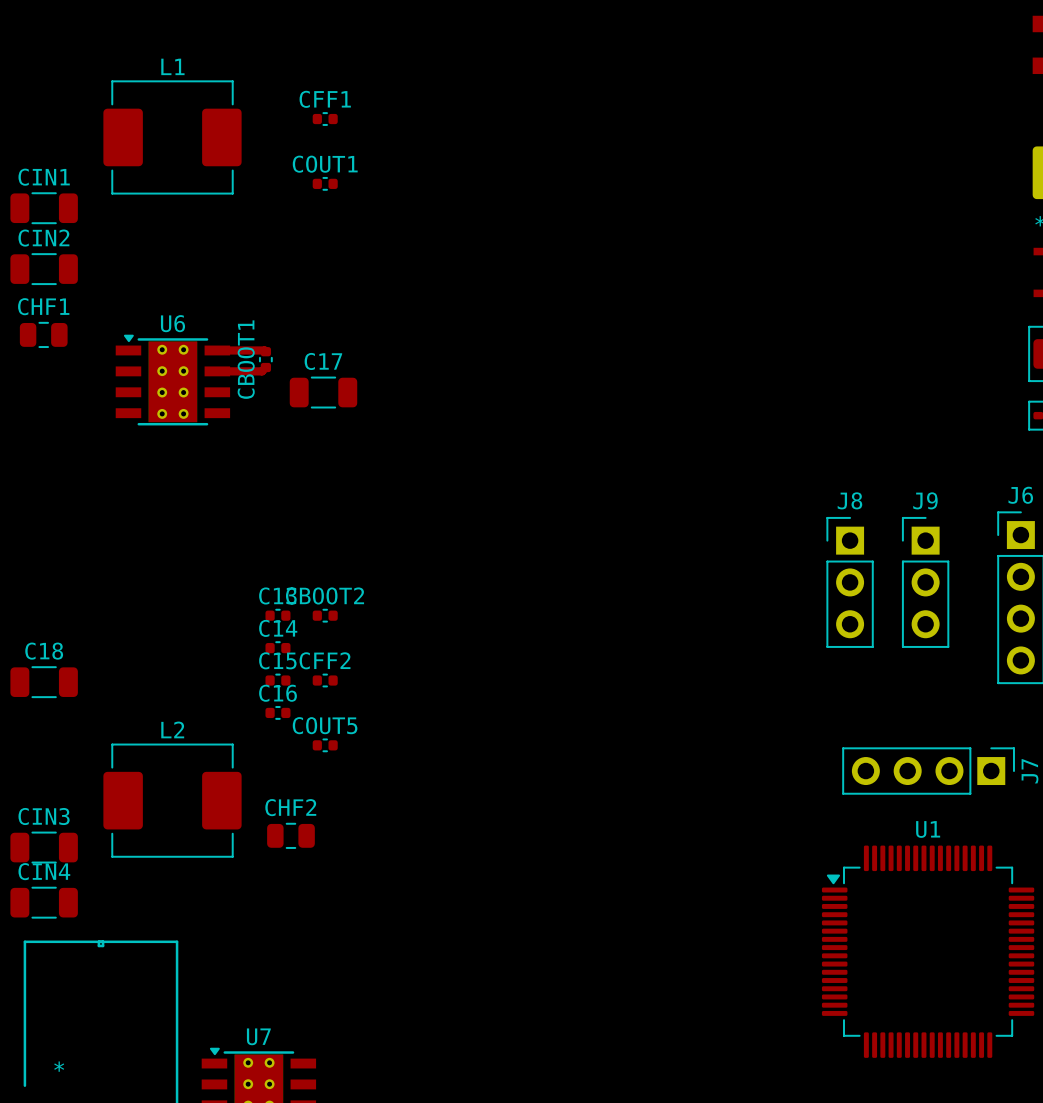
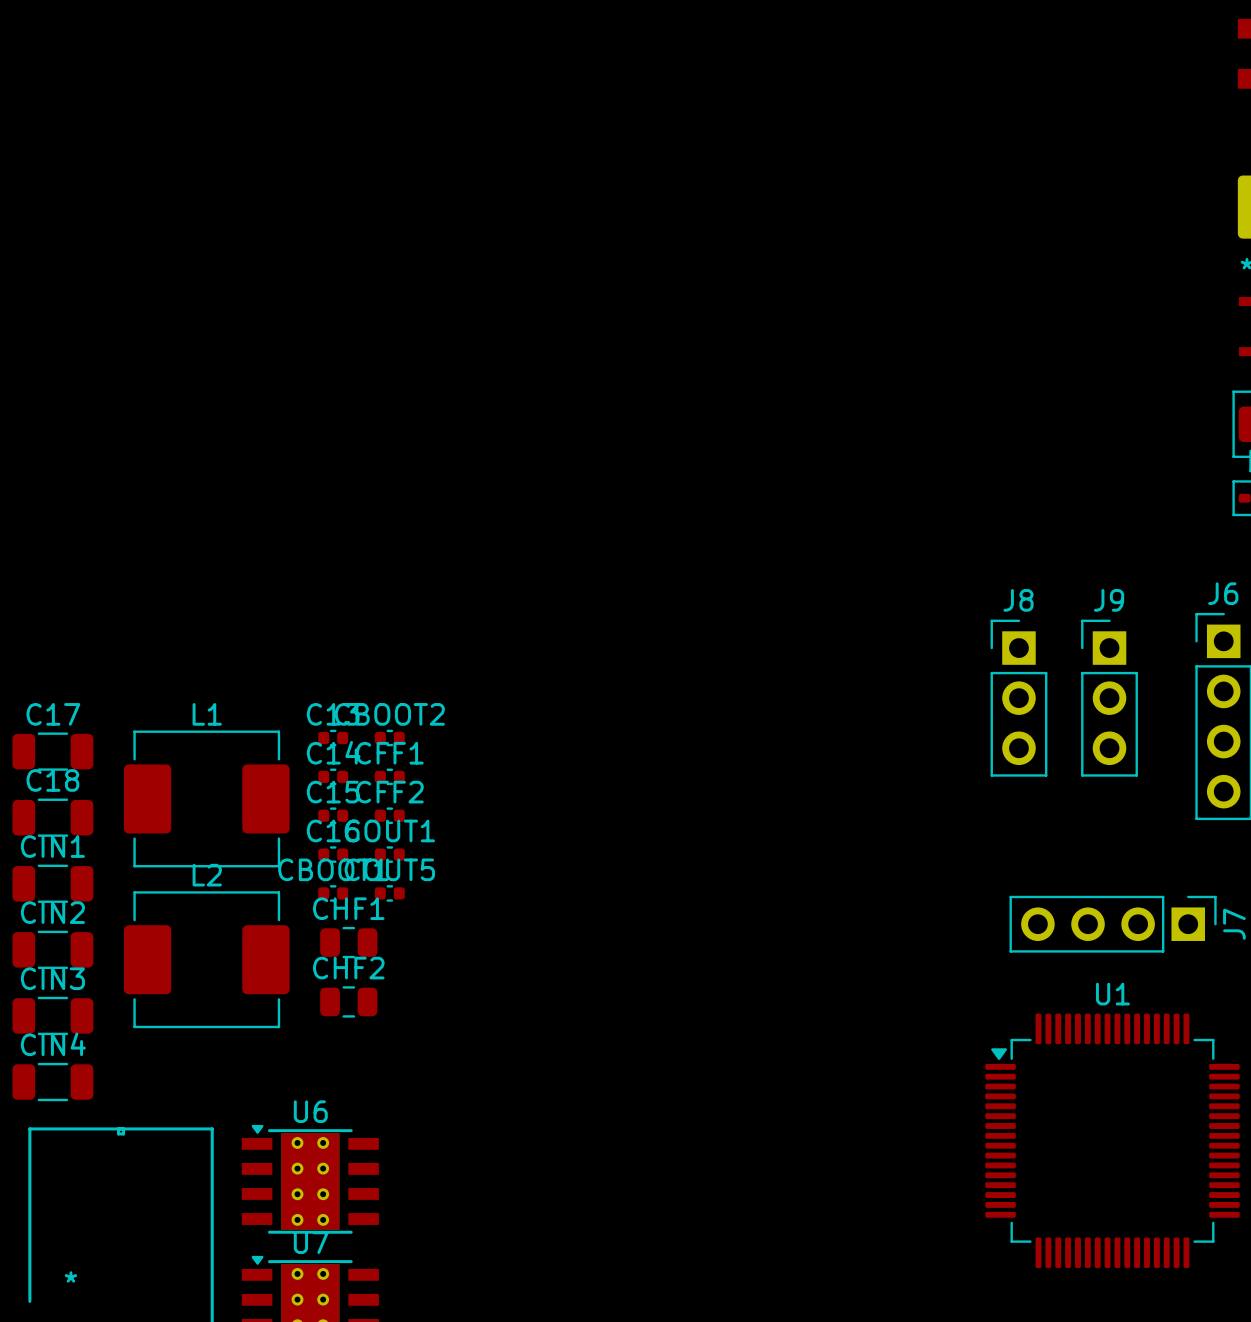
CFF1 position: (325, 119) -> (389, 776)
L1 position: (172, 137) -> (206, 798)
COUT1 position: (325, 183) -> (389, 854)
CIN1 position: (44, 208) -> (52, 883)
CIN2 position: (44, 269) -> (52, 949)
CHF1 position: (43, 334) -> (348, 942)
top track: (217, 350) (265, 351) -> none
CBOOT1 rotation: 0° (265, 359) -> 90° clockwise (333, 893)
CBOOT1 position: (265, 359) -> (333, 893)
top track: (265, 367) (262, 371) (217, 371) -> none
U6 position: (172, 380) -> (310, 1179)
C17 position: (323, 392) -> (52, 751)

